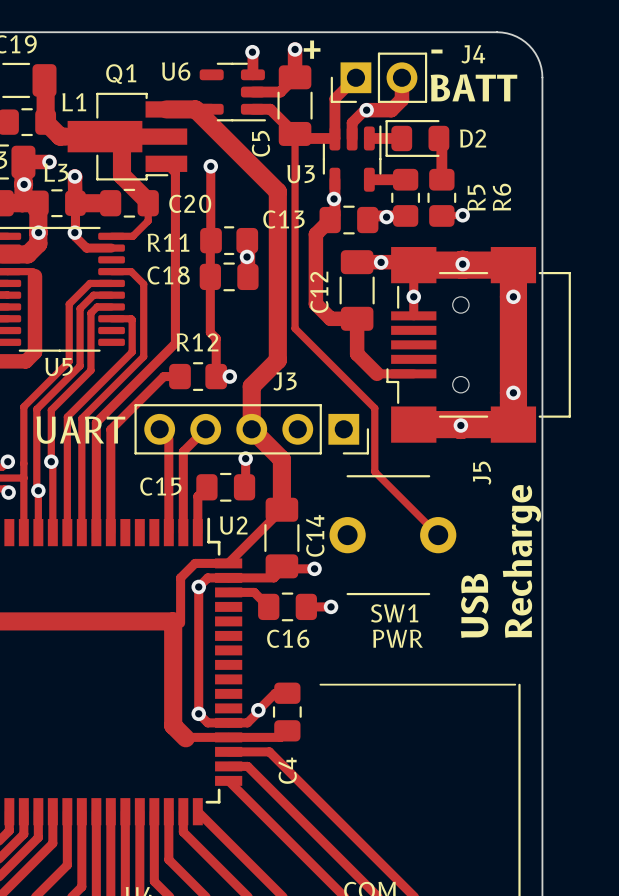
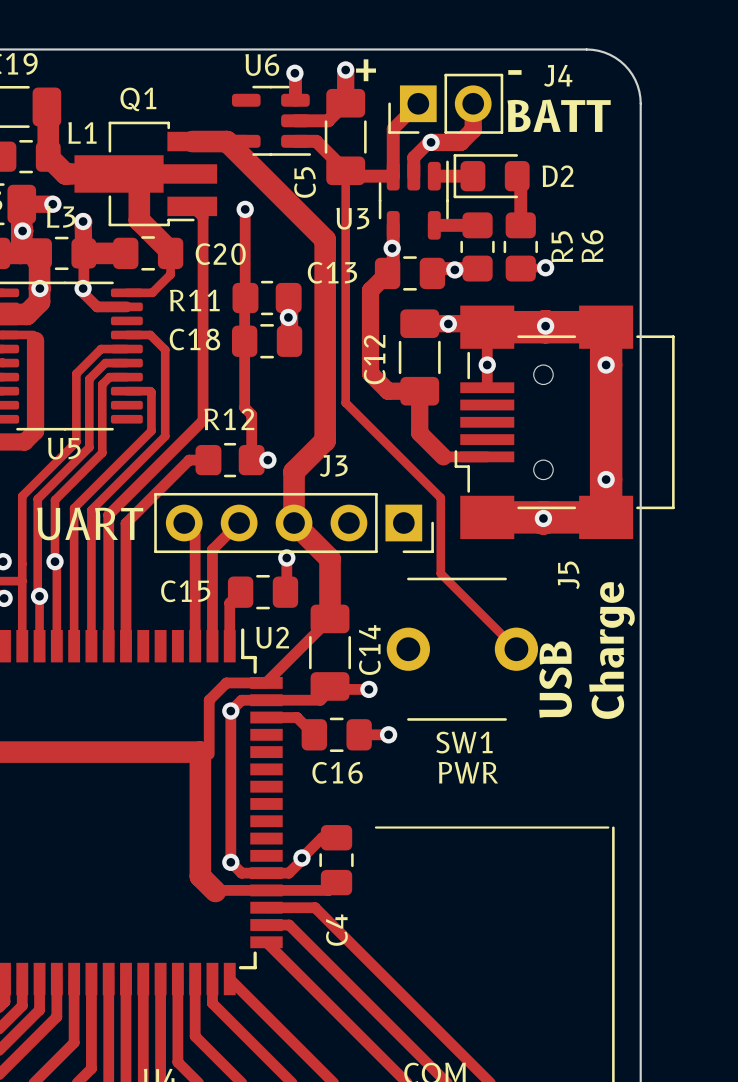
U6 name position: U6 (176, 71) -> U6 (262, 64)
text: Recharge (521, 561) -> Charge (611, 650)
text position: USB (474, 605) -> USB (555, 679)

